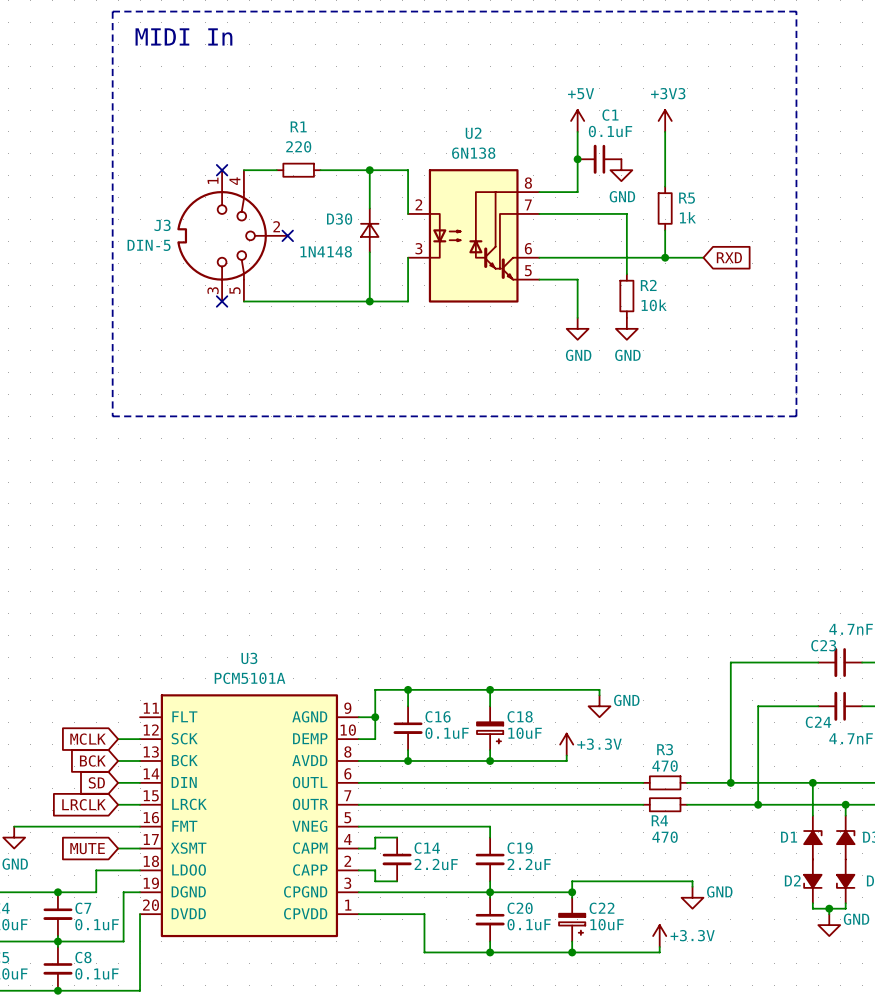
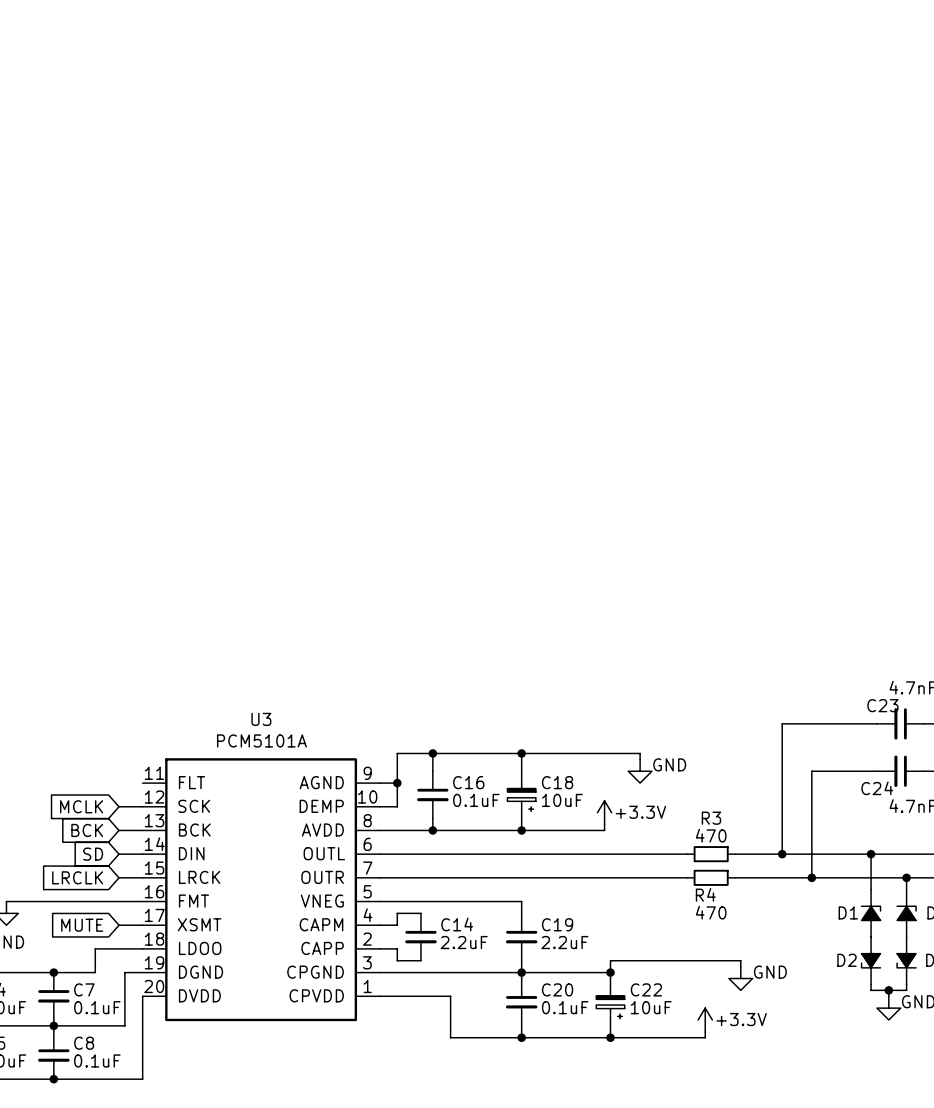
line: (112, 11) (112, 416) (796, 416) (796, 11) (112, 11) -> none
text: MIDI In (183, 36) -> none
power symbol: +5V (577, 120) -> none
power symbol: +3V3 (665, 120) -> none
wire: (577, 131) (577, 192) (539, 192) -> none
wire: (665, 131) (665, 186) -> none
junction: (577, 159) -> none
C1: 0.1uF (599, 159) -> none
no-connect mark: (222, 170) -> none
wire: (243, 170) (276, 170) -> none
R1: 220 (298, 170) -> none
wire: (320, 170) (408, 170) (408, 213) -> none
wire: (369, 170) (369, 208) -> none
junction: (369, 170) -> none
power symbol: GND (621, 170) -> none
R5: 1k (665, 208) -> none
wire: (539, 213) (626, 213) (626, 274) -> none
D30: 1N4148 (369, 230) -> none
wire: (665, 230) (665, 257) -> none
J3: DIN-5 (232, 235) -> none
no-connect mark: (287, 235) -> none
U2: 6N138 (473, 235) -> none
wire: (369, 252) (369, 301) -> none
wire: (408, 257) (408, 301) (243, 301) -> none
wire: (539, 257) (703, 257) -> none
junction: (665, 257) -> none
global label: RXD (729, 257) -> none
wire: (539, 279) (577, 279) (577, 317) -> none
R2: 10k (626, 296) -> none
no-connect mark: (222, 301) -> none
junction: (369, 301) -> none
power symbol: GND (577, 328) -> none
power symbol: GND (626, 328) -> none

